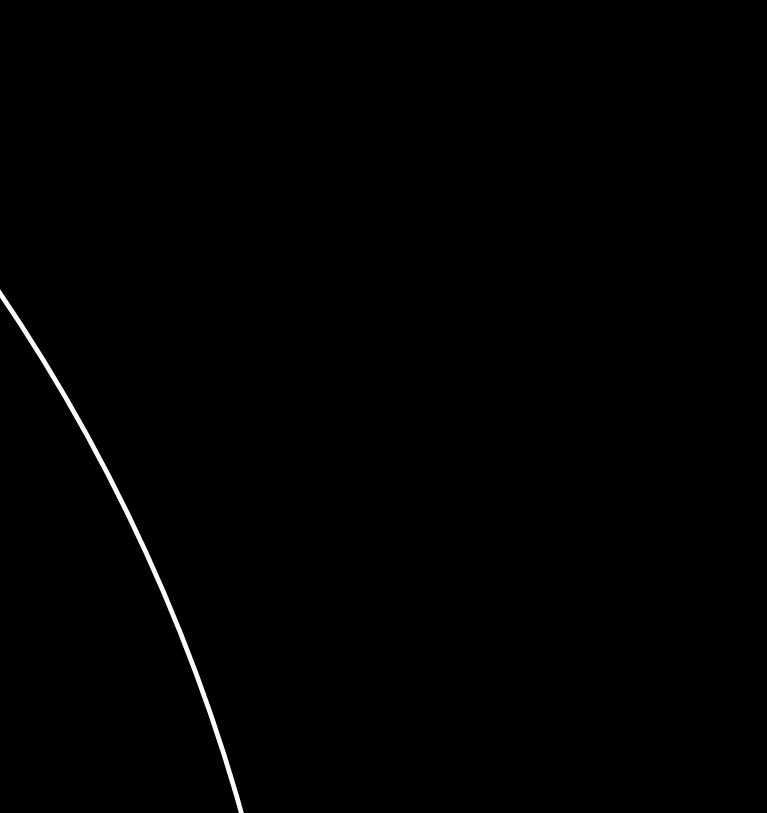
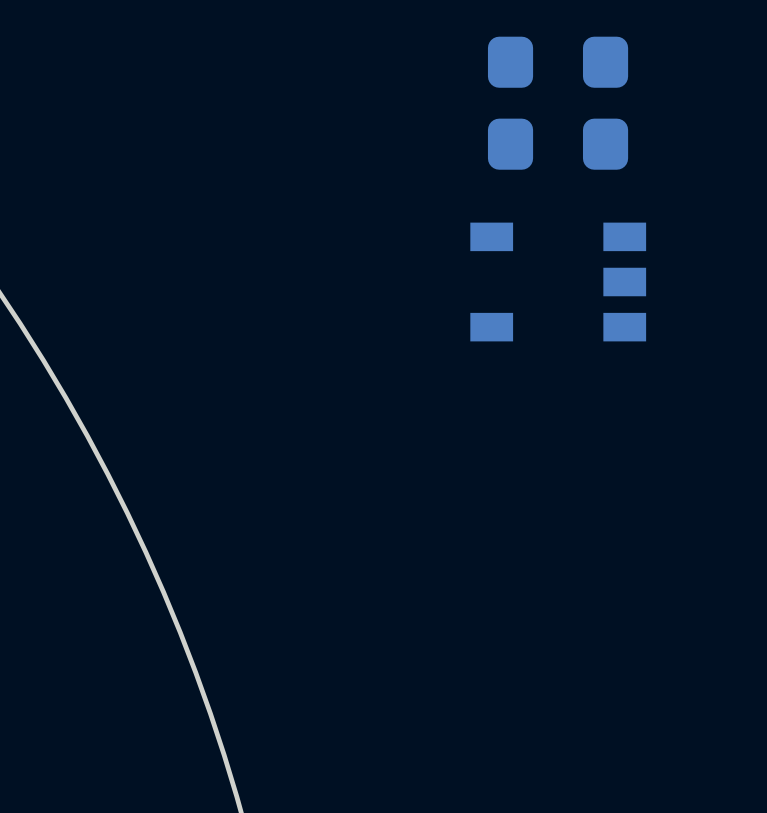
part: none -> (510, 103)
part: none -> (605, 103)
part: none -> (558, 282)

